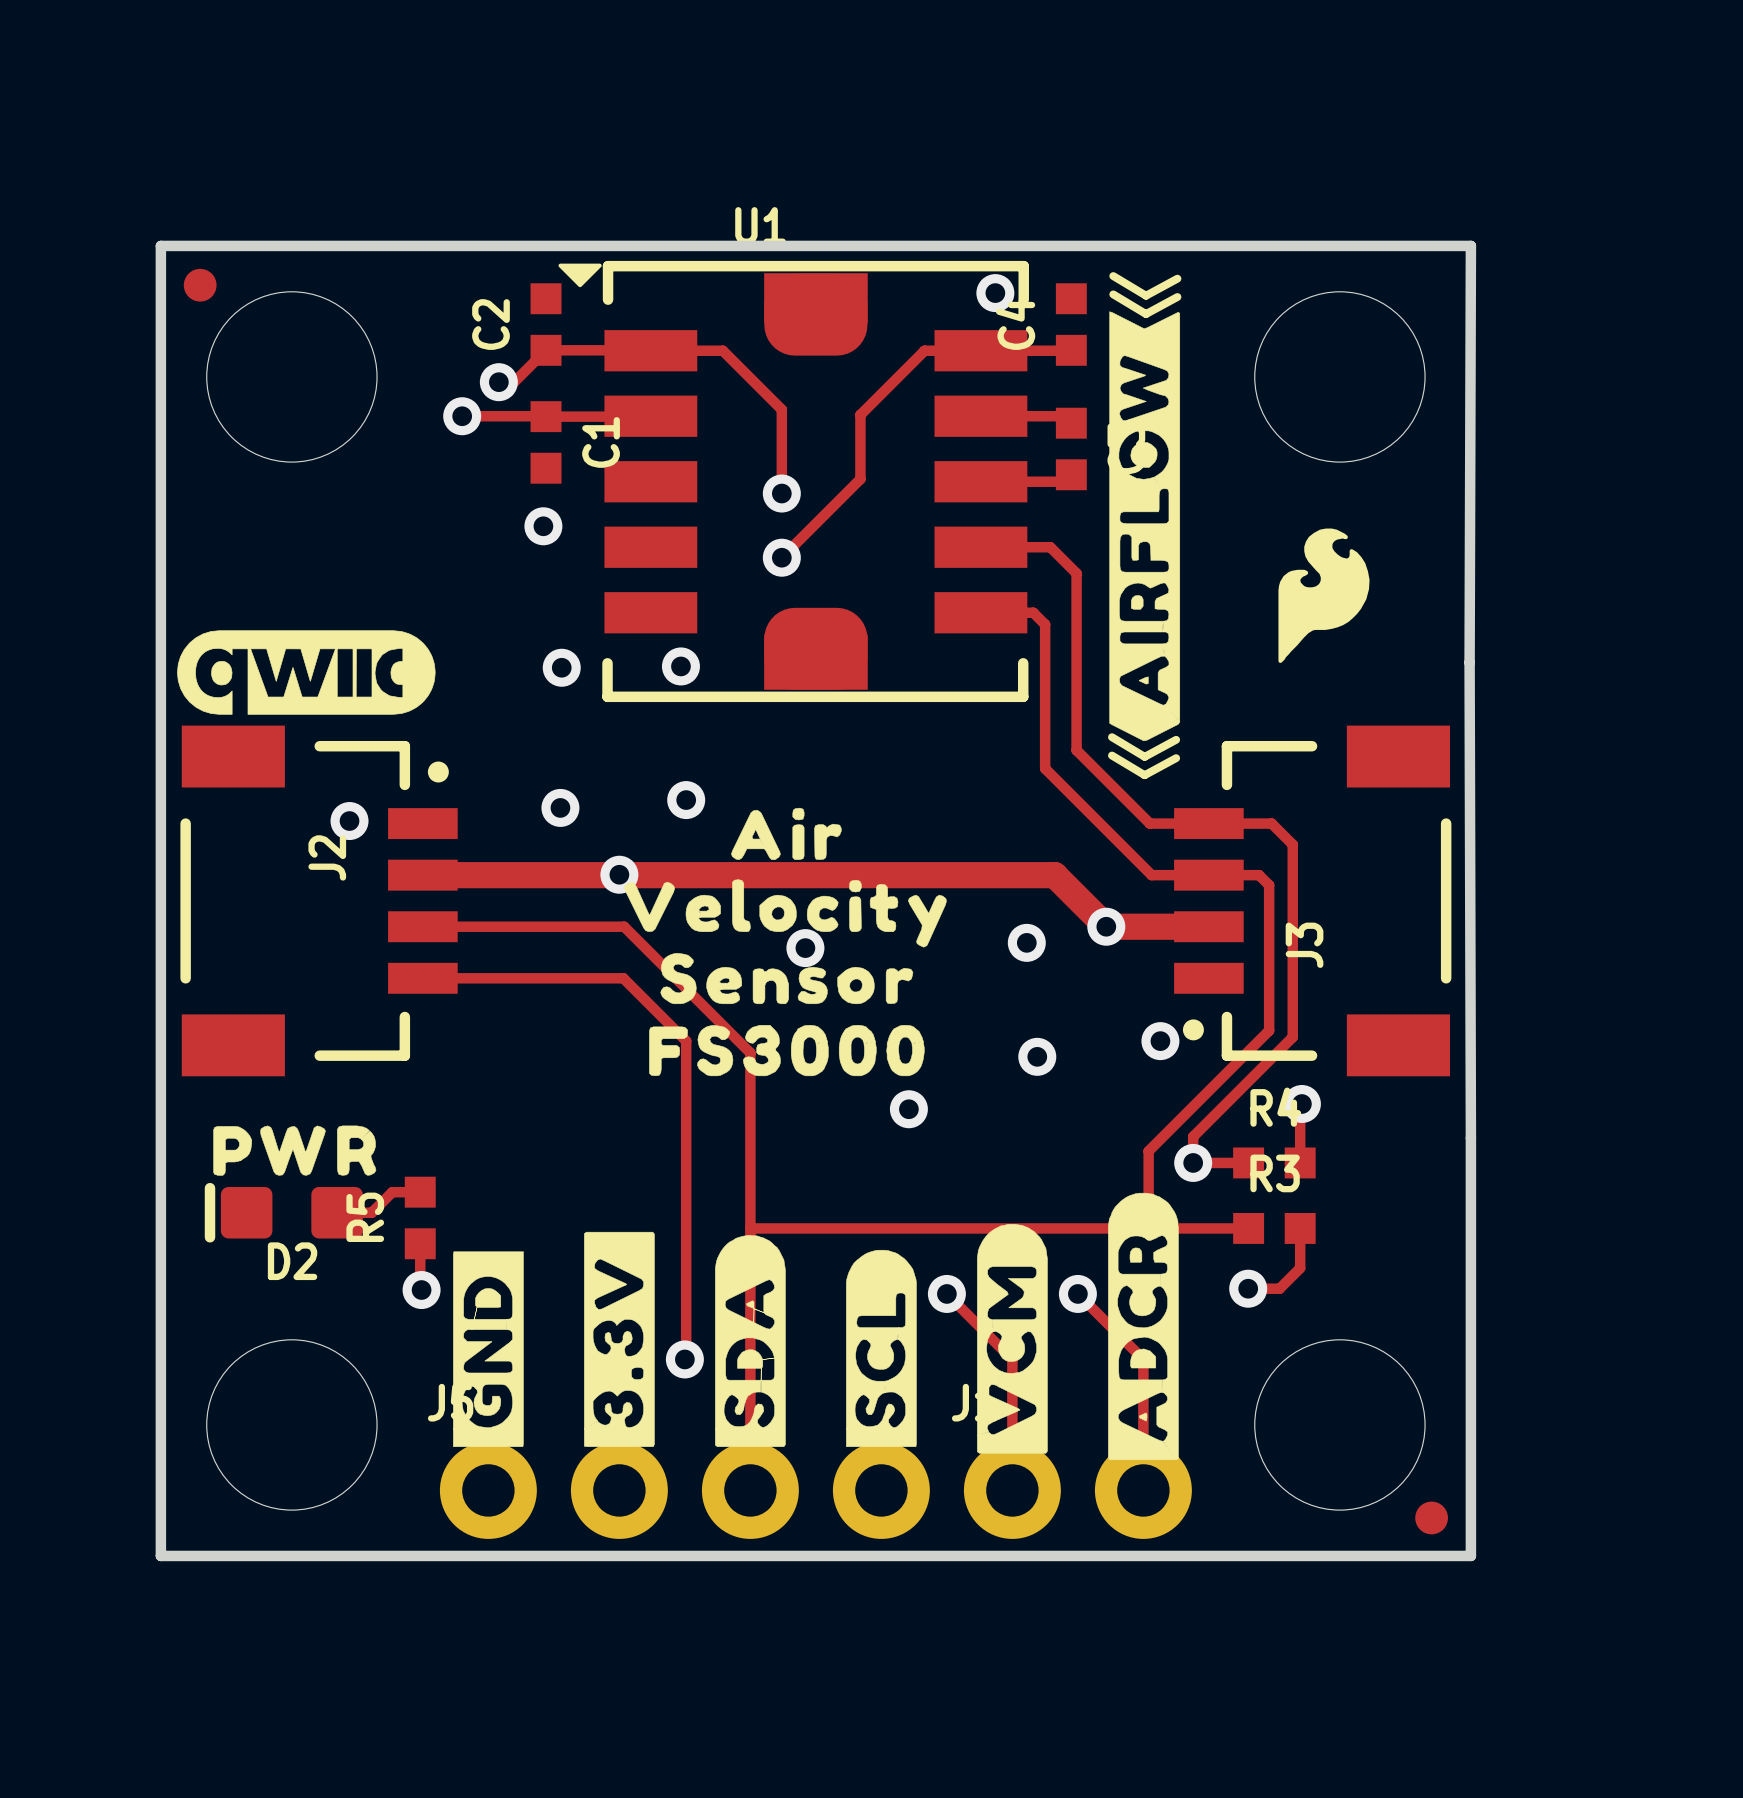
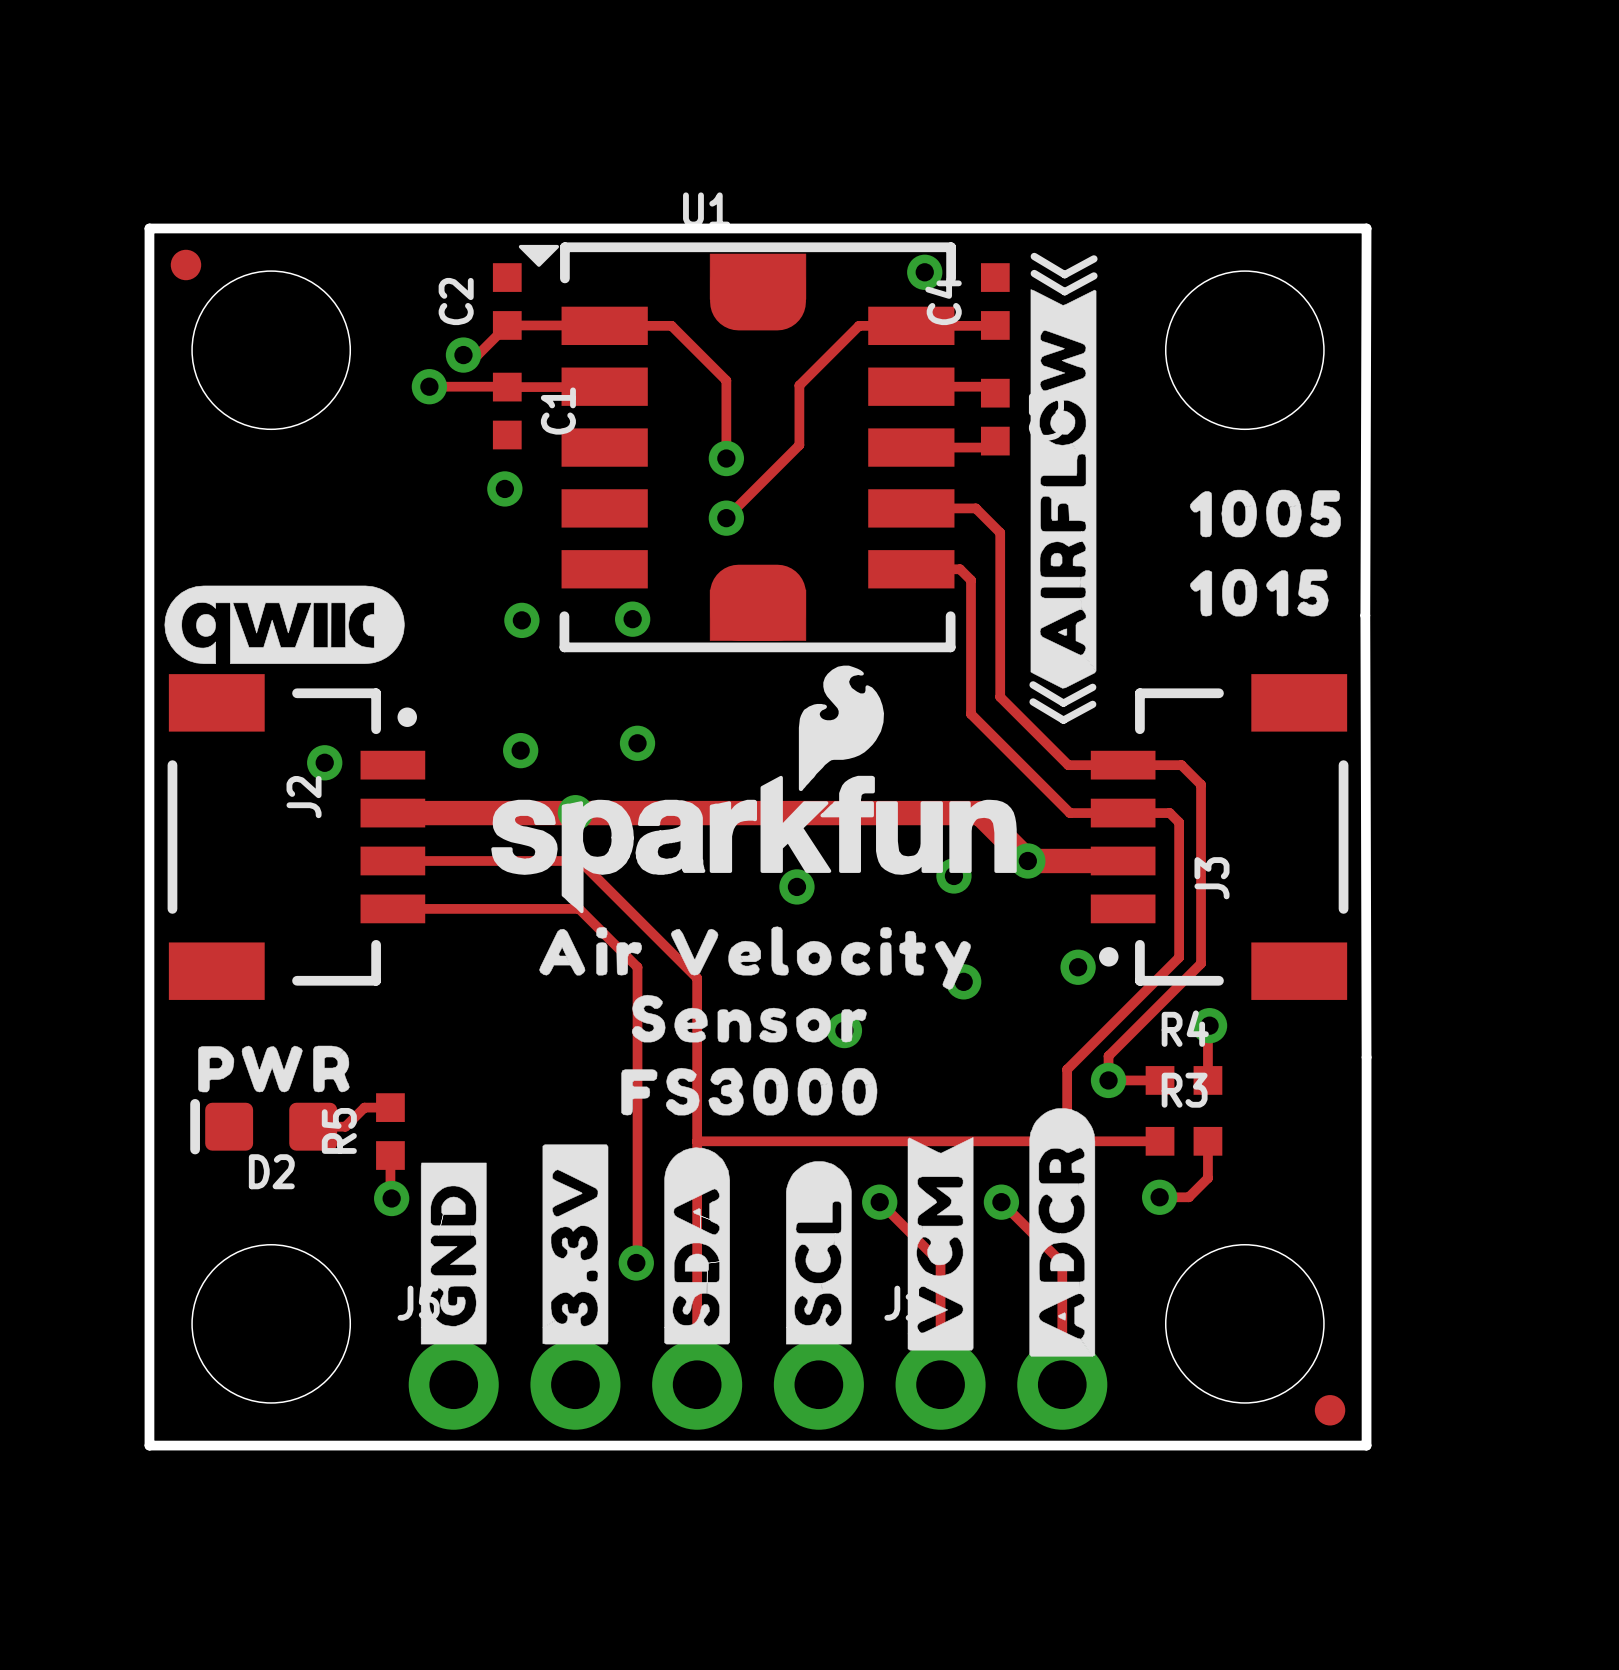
drawing: none -> [1189, 489, 1341, 617]
drawing: [1278, 528, 1370, 663] -> none
drawing: none -> [491, 665, 1017, 914]
drawing position: (786, 833) -> (590, 951)
drawing position: (785, 913) -> (820, 958)
via position: (805, 948) -> (796, 886)
drawing position: (786, 978) -> (749, 1018)
drawing position: (786, 1050) -> (749, 1091)
drawing shape: [977, 1224, 1048, 1454] -> [907, 1137, 974, 1351]

